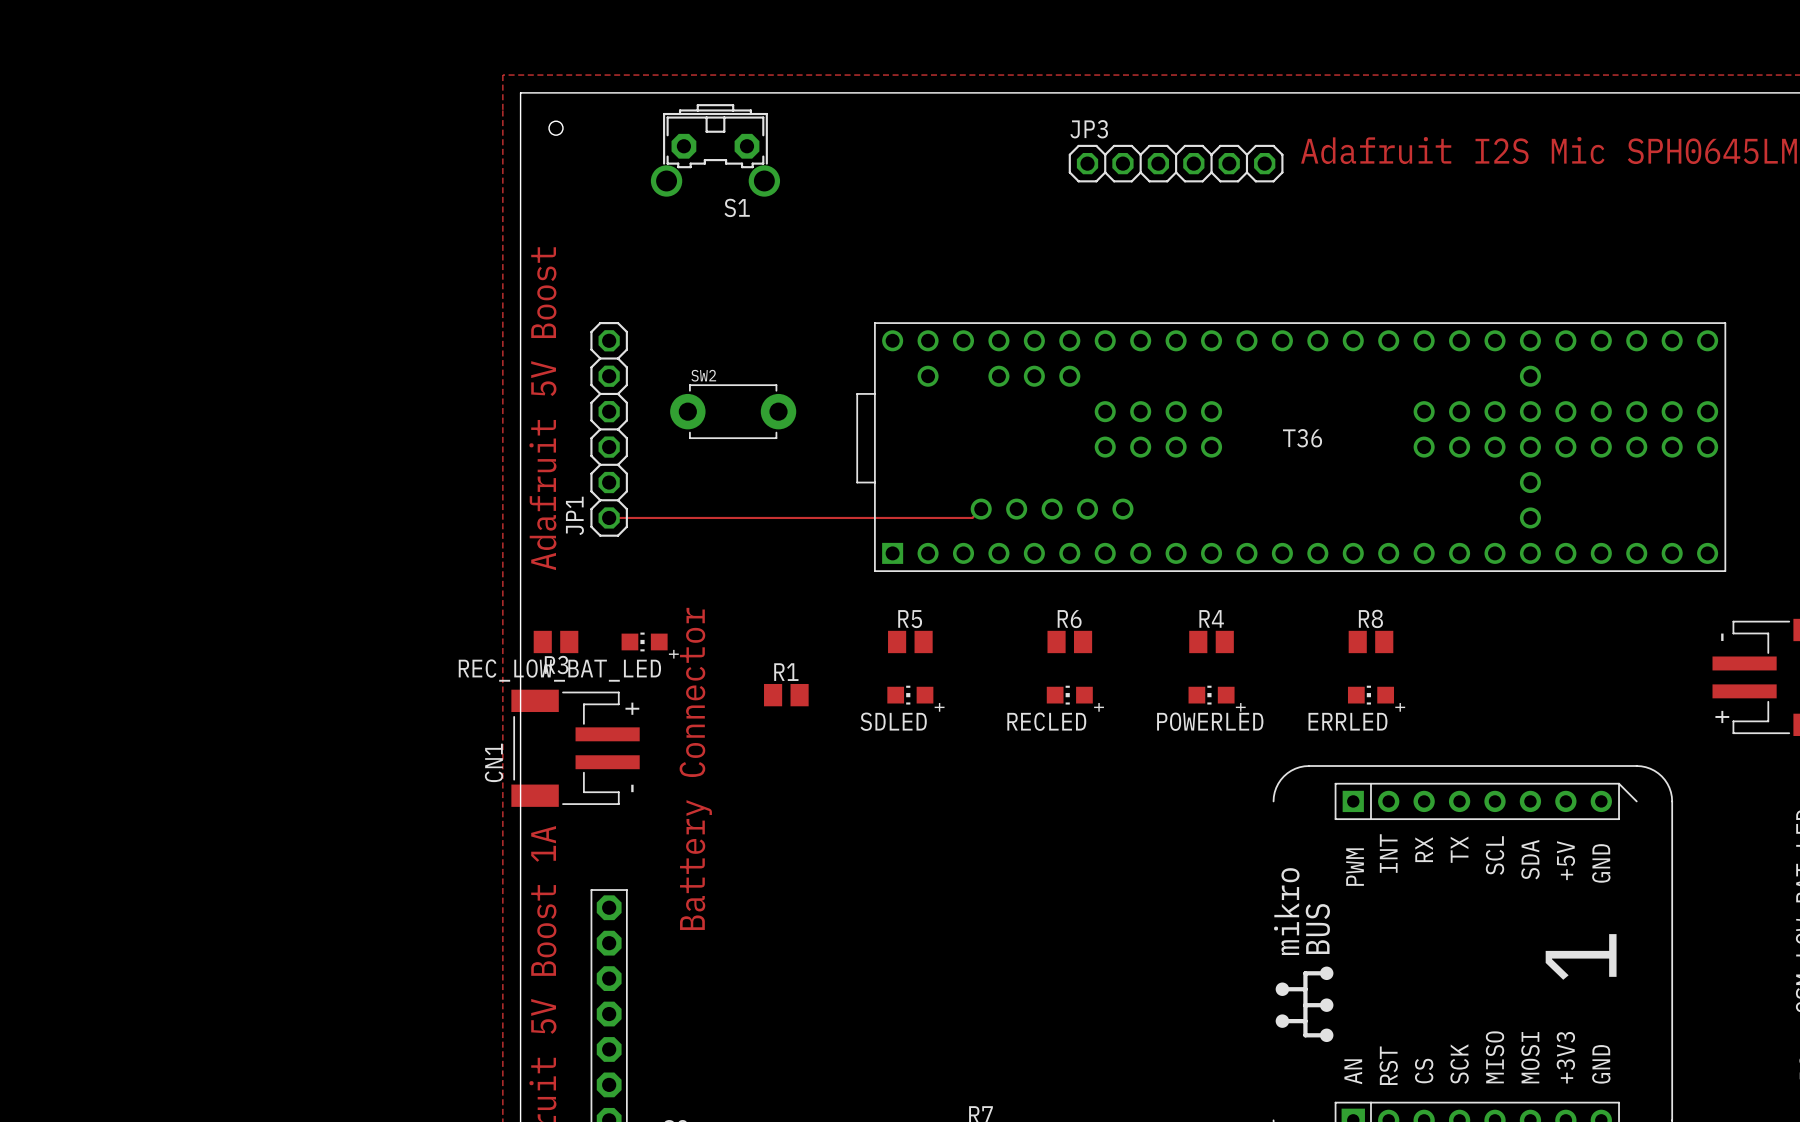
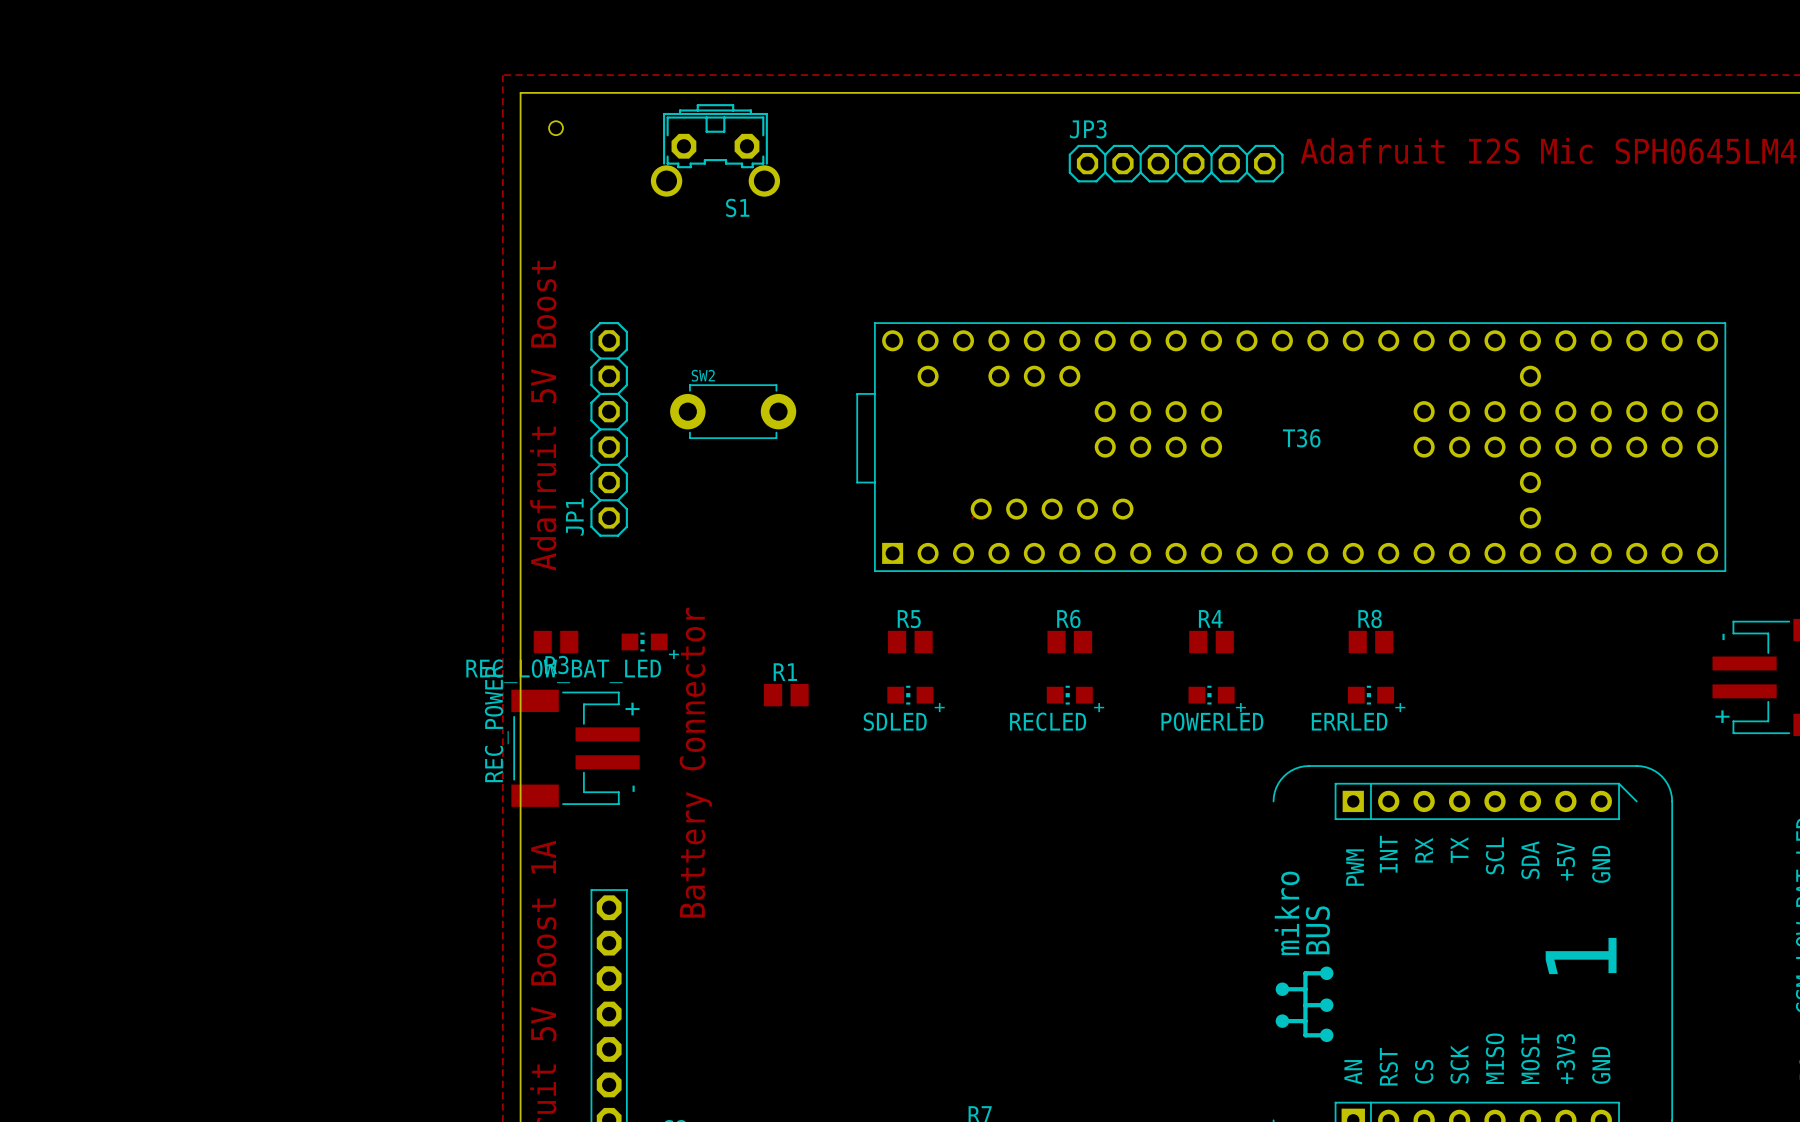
top track: (609, 517) (972, 517) -> none
CN1 name: CN1 (494, 762) -> REC_POWER (496, 723)

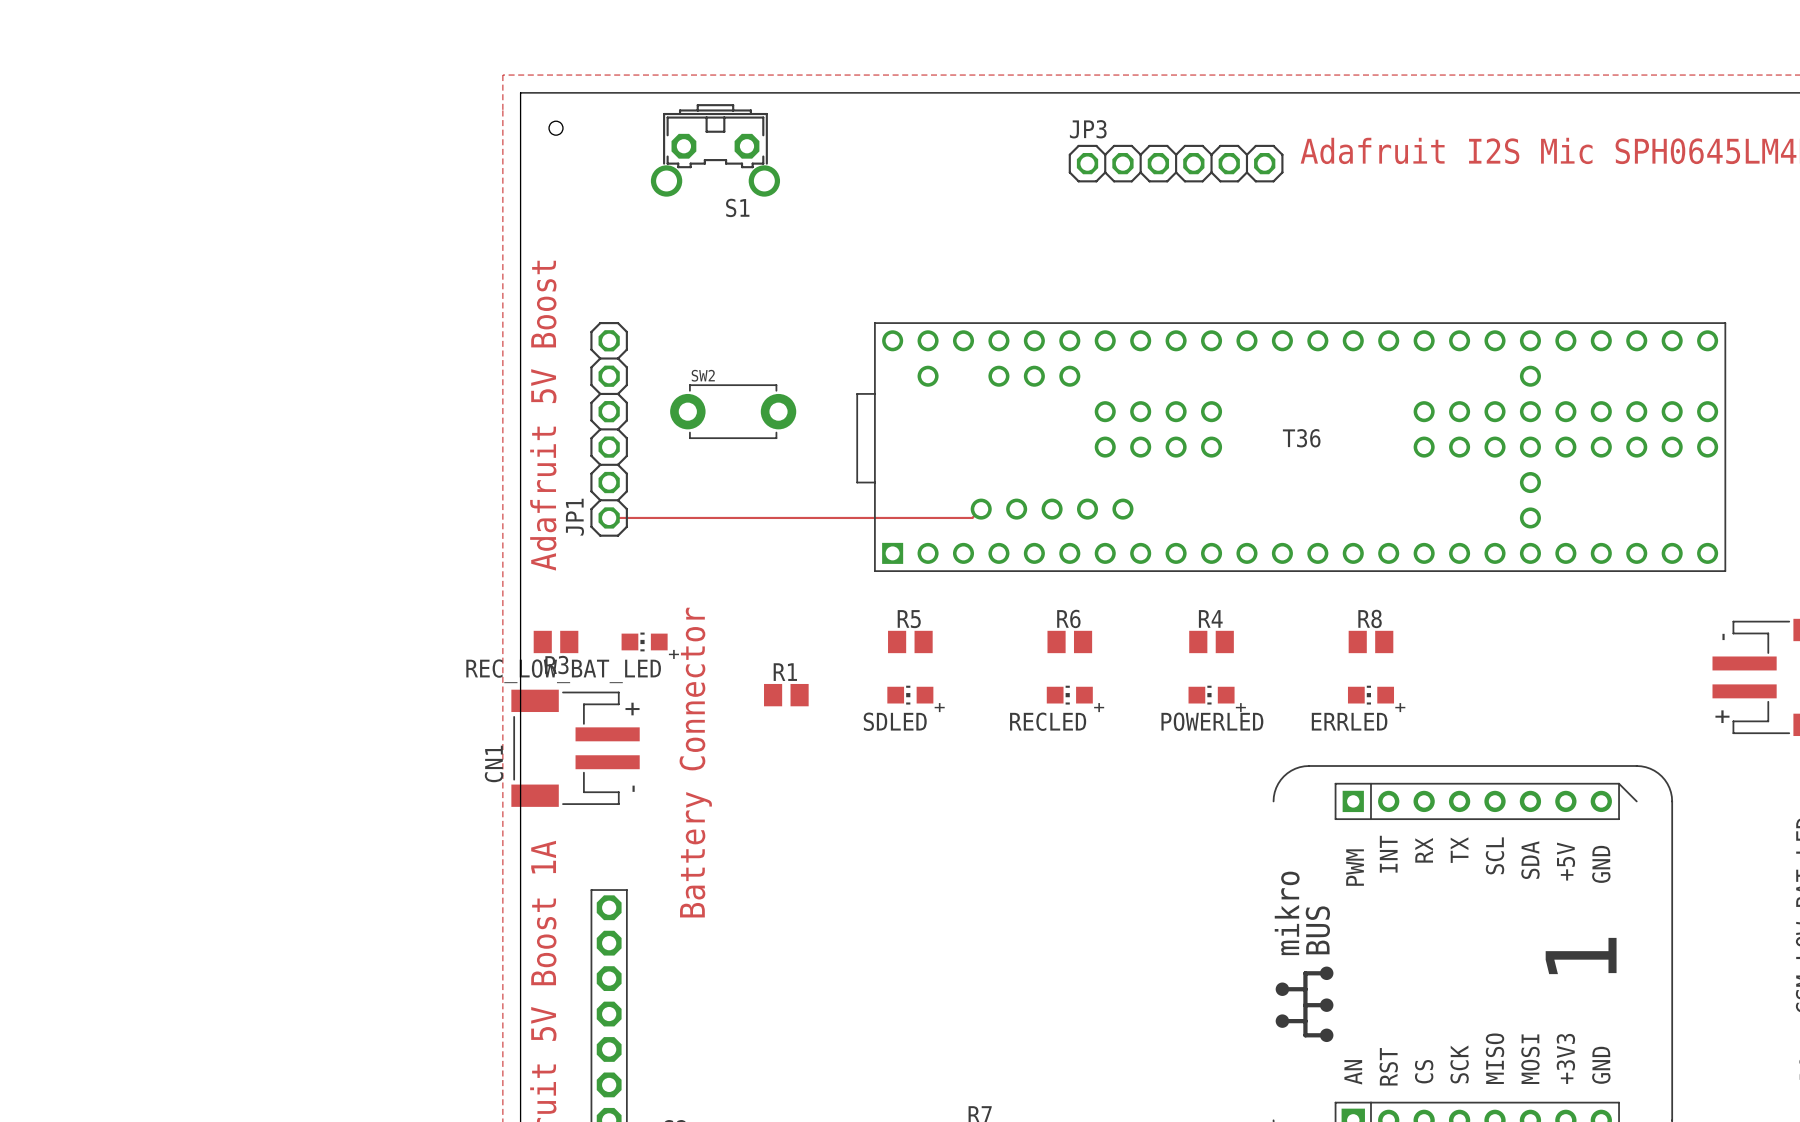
top track: none -> (609, 517) (972, 517)
REC_POWER name: REC_POWER (496, 723) -> CN1 (494, 763)

